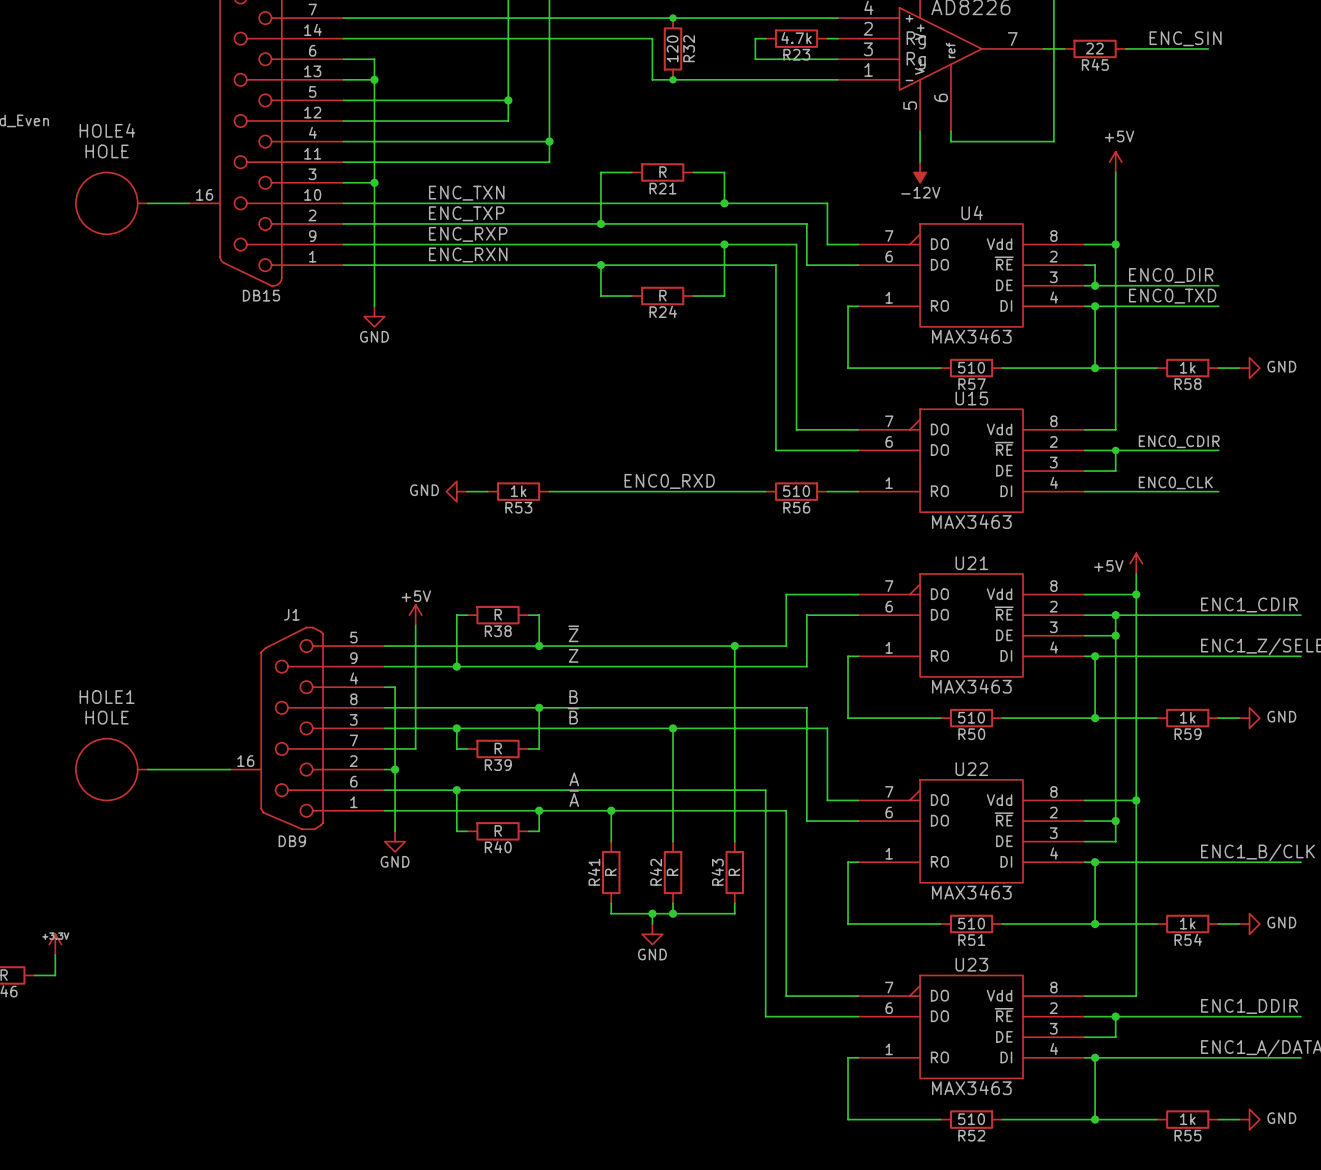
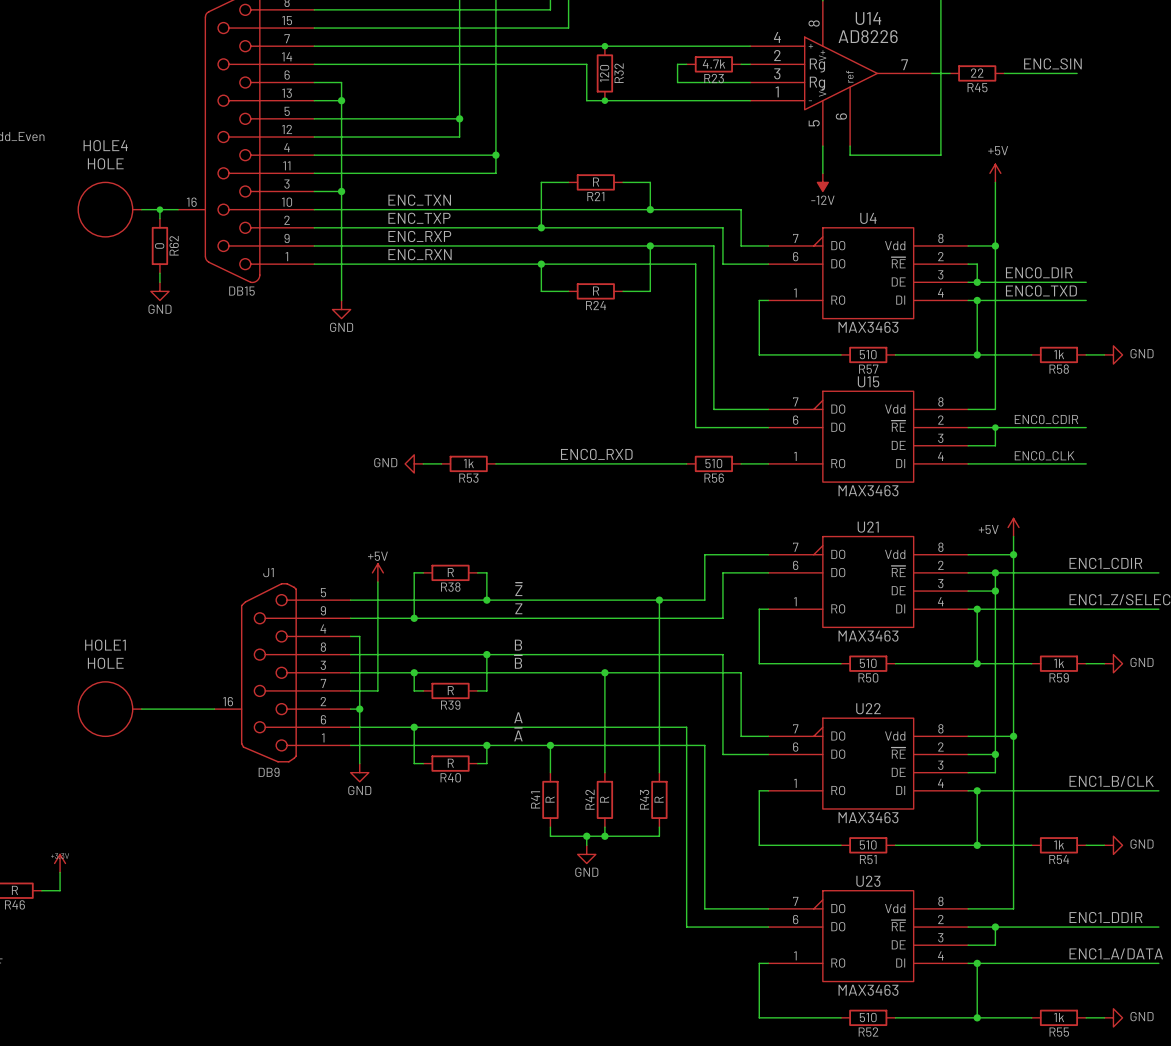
wire: none -> (159, 209) (159, 218)
junction: none -> (159, 209)
R62: none -> 0 (159, 245)
wire: none -> (159, 273) (159, 282)
power symbol: none -> GND (159, 291)

